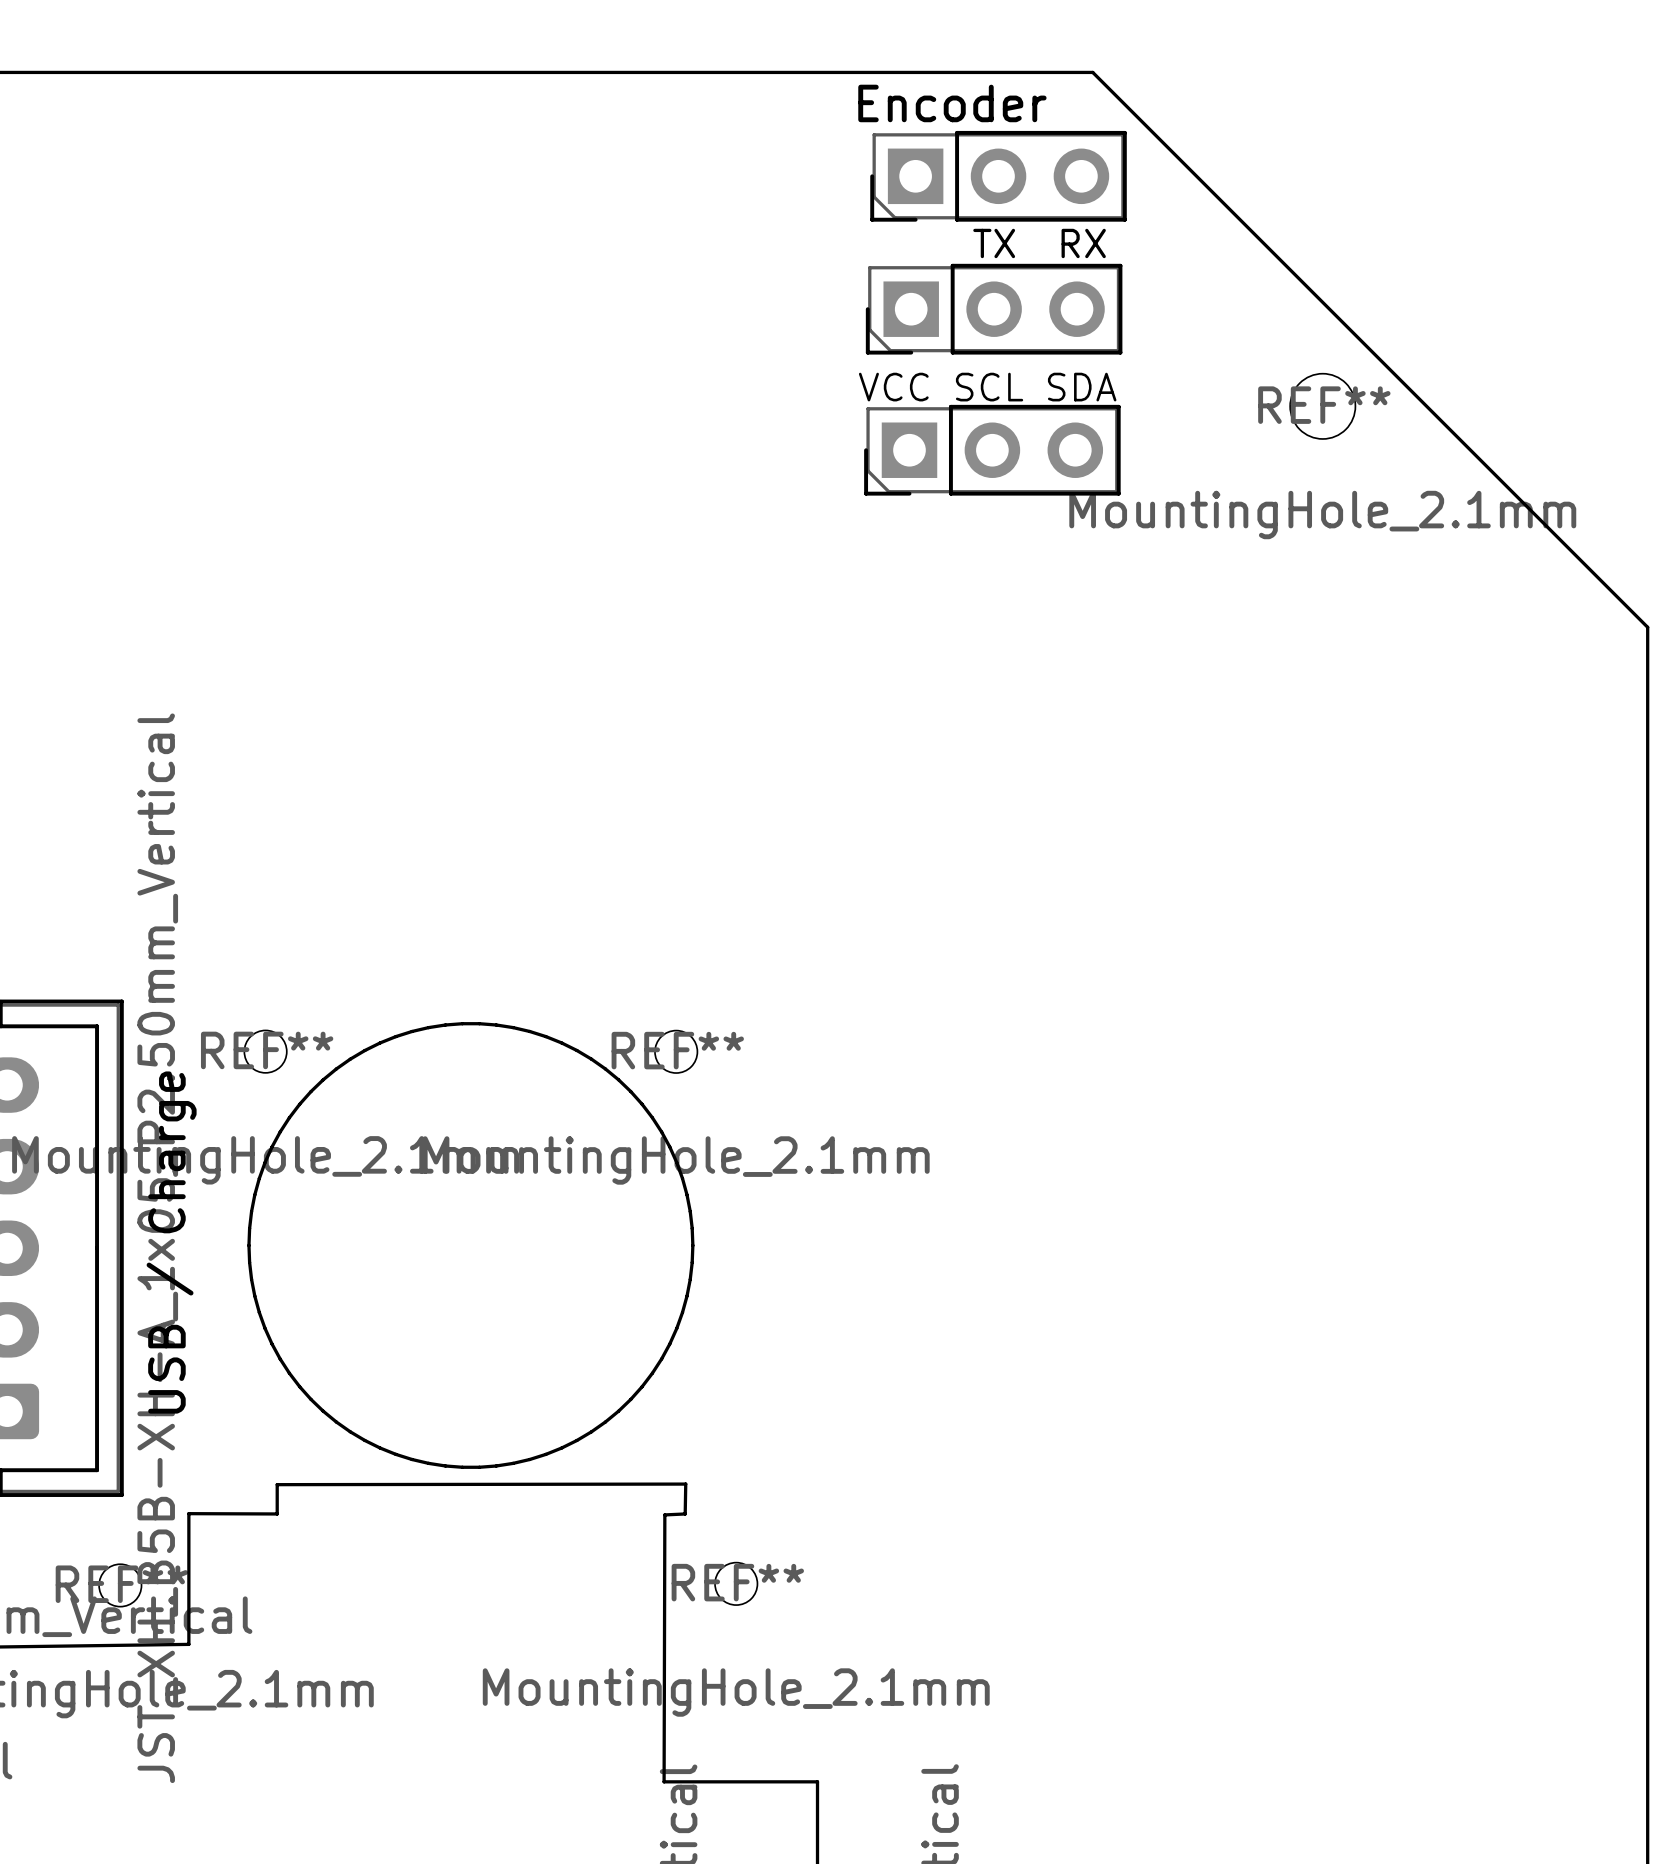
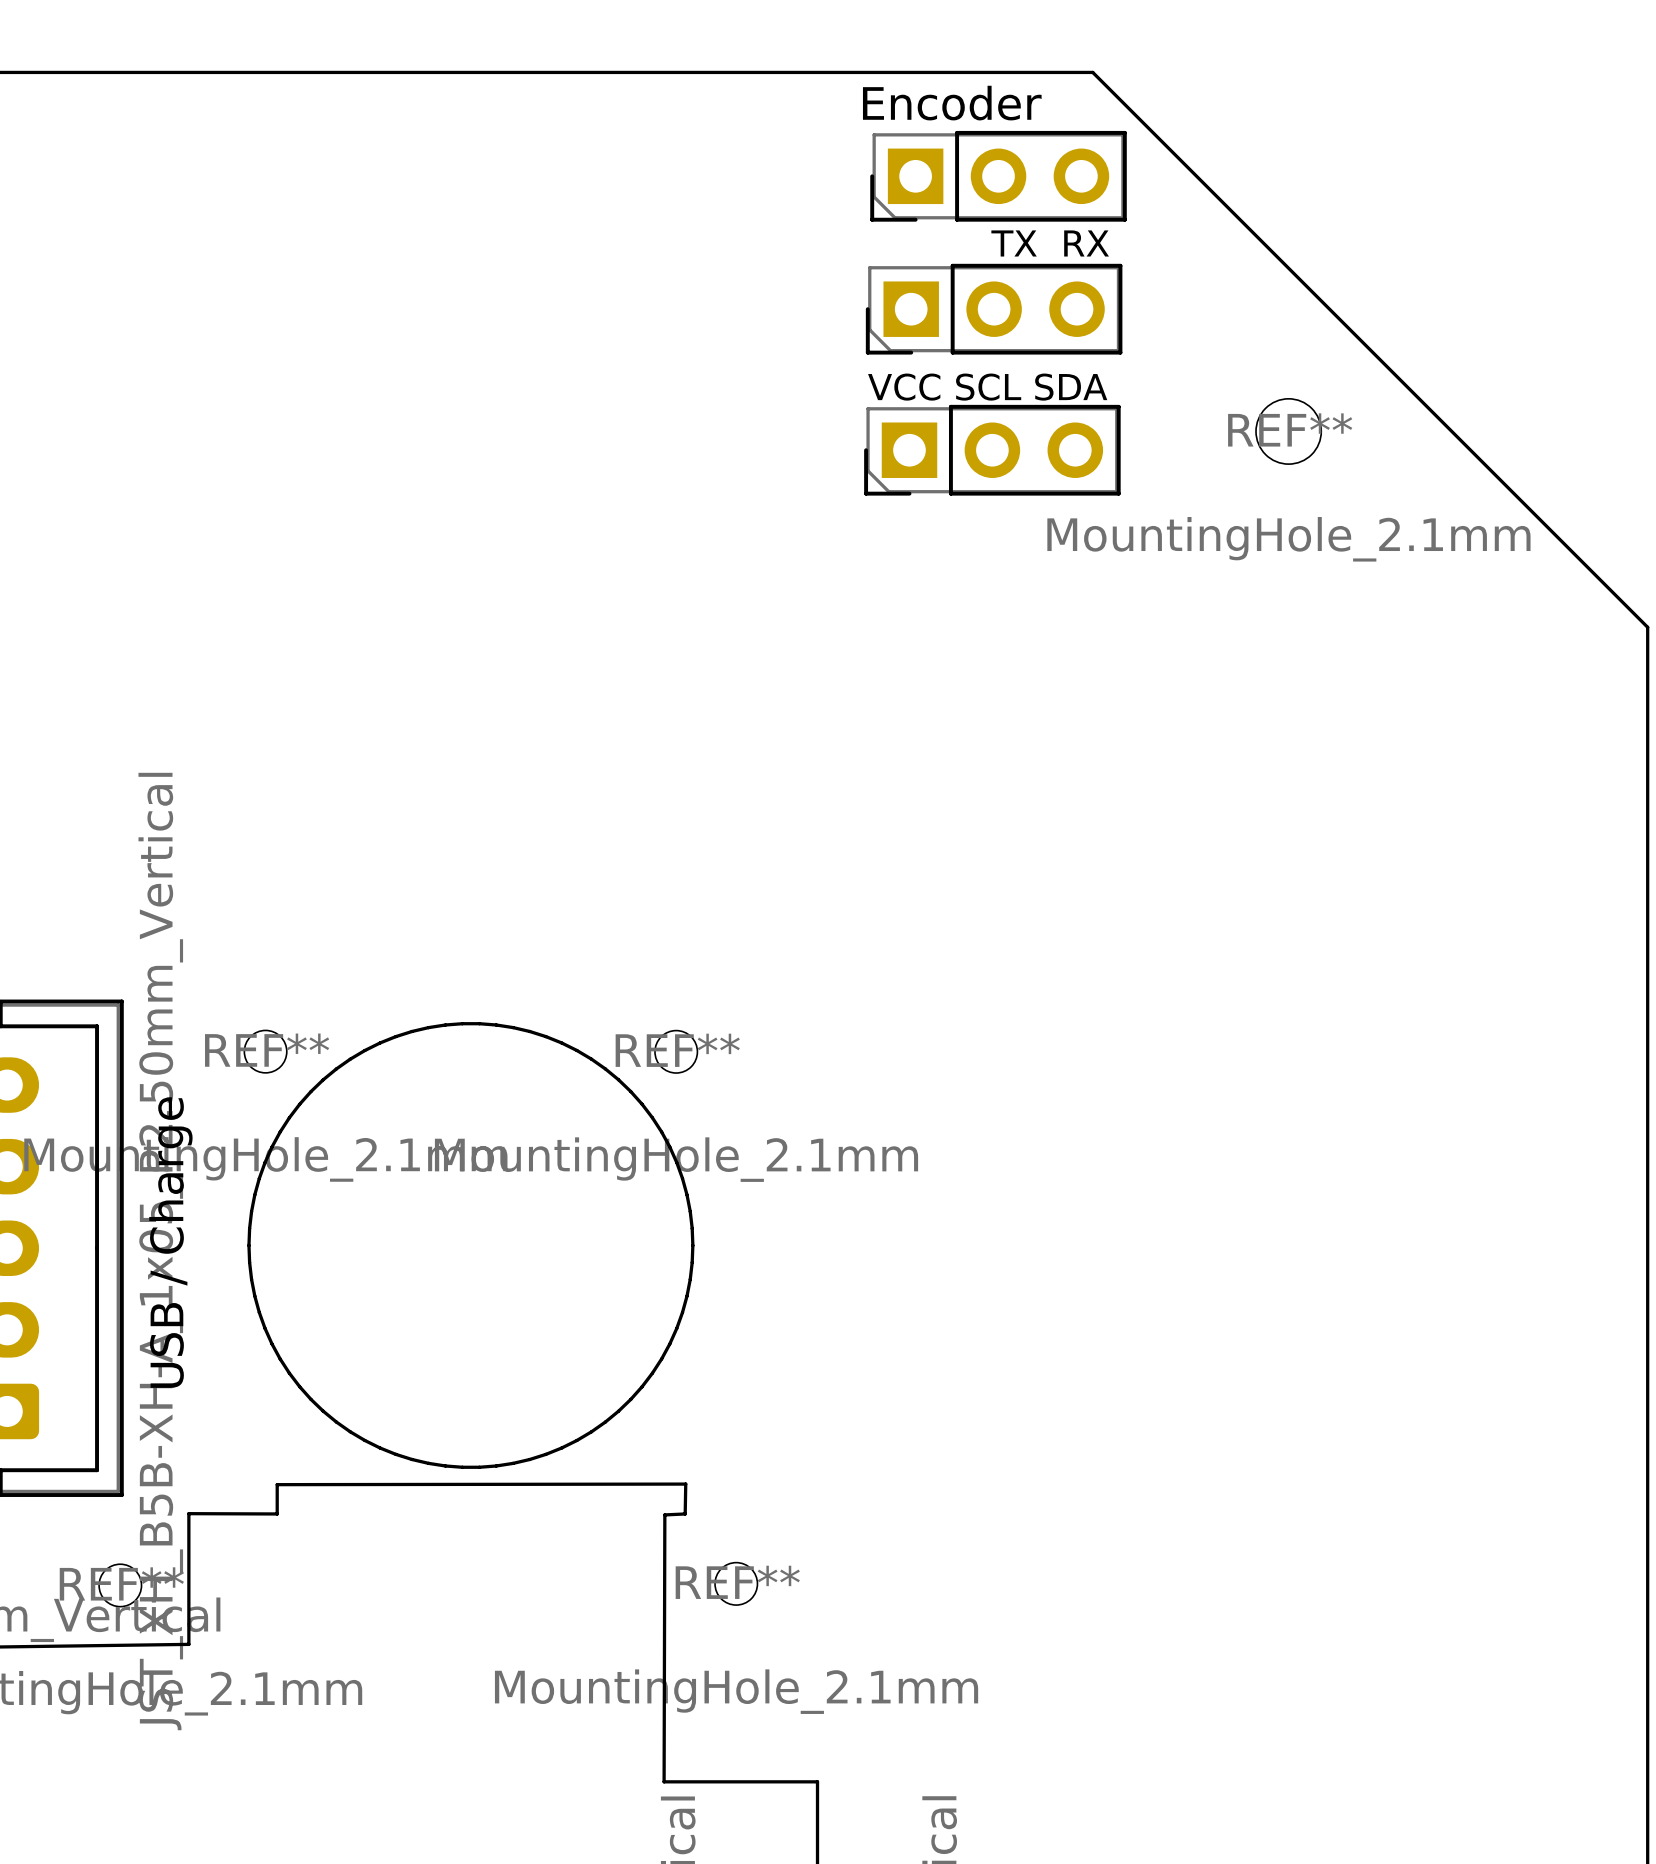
REF** position: (1322, 406) -> (1288, 431)

